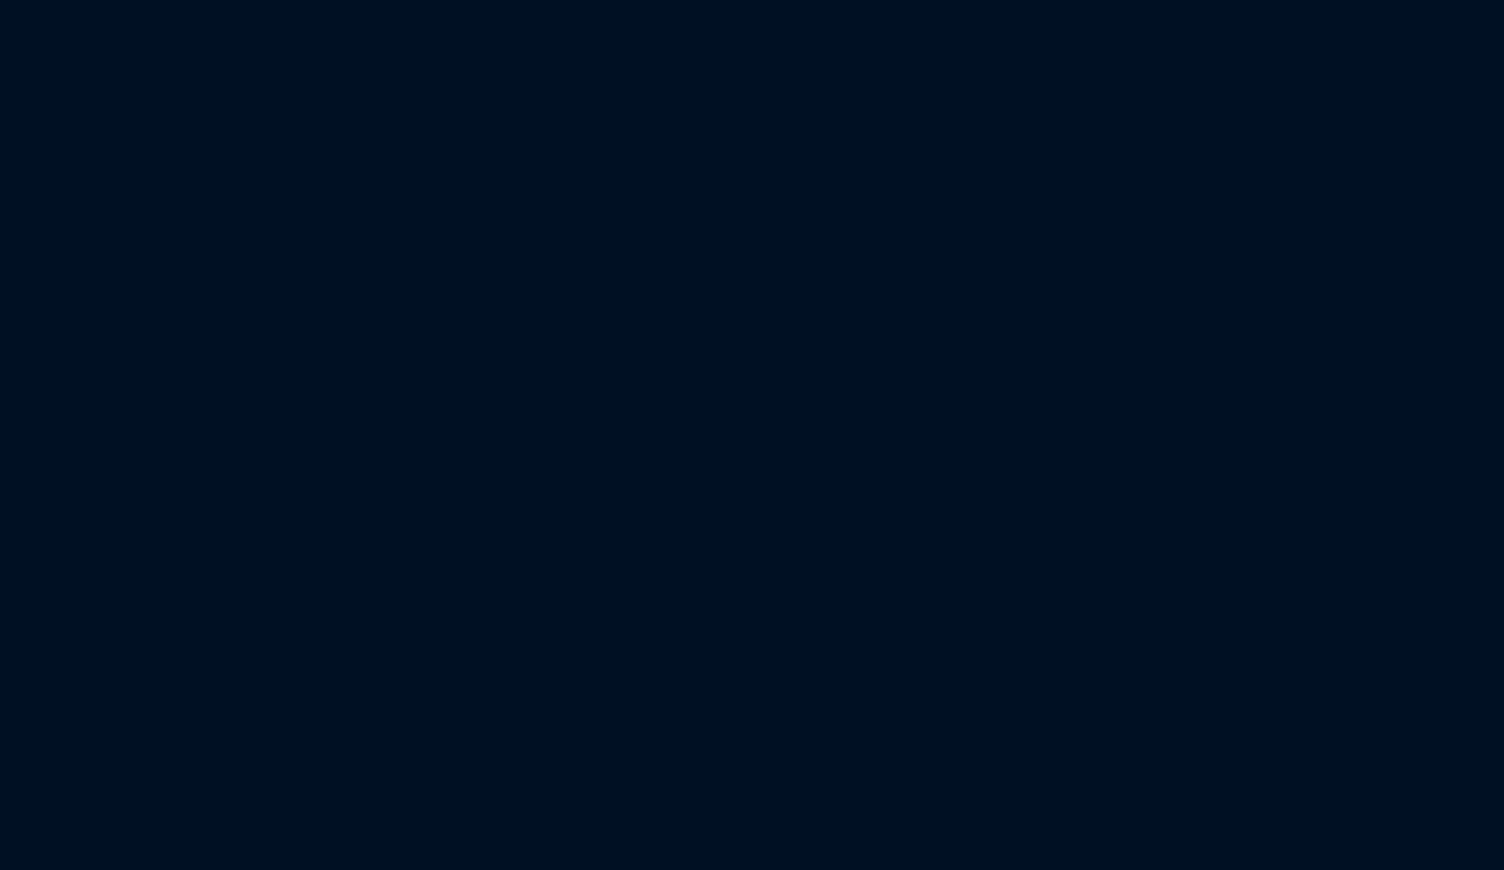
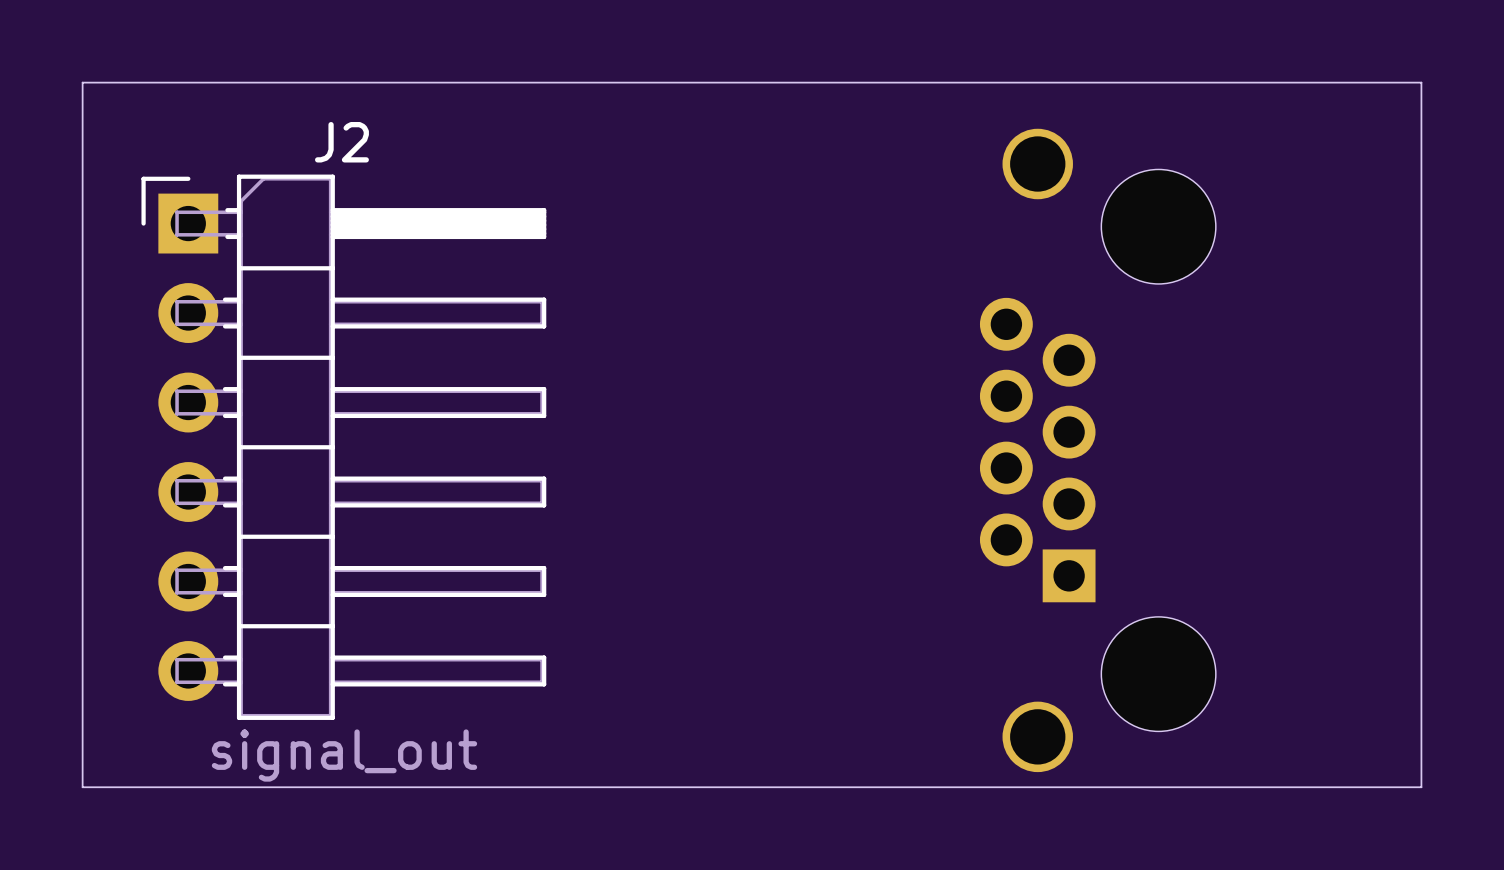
board edge: none -> (1421, 82) (1421, 787) (82, 787) (82, 82) (1421, 82)
J2: none -> signal_out (343, 447)
part: none -> (1097, 450)

